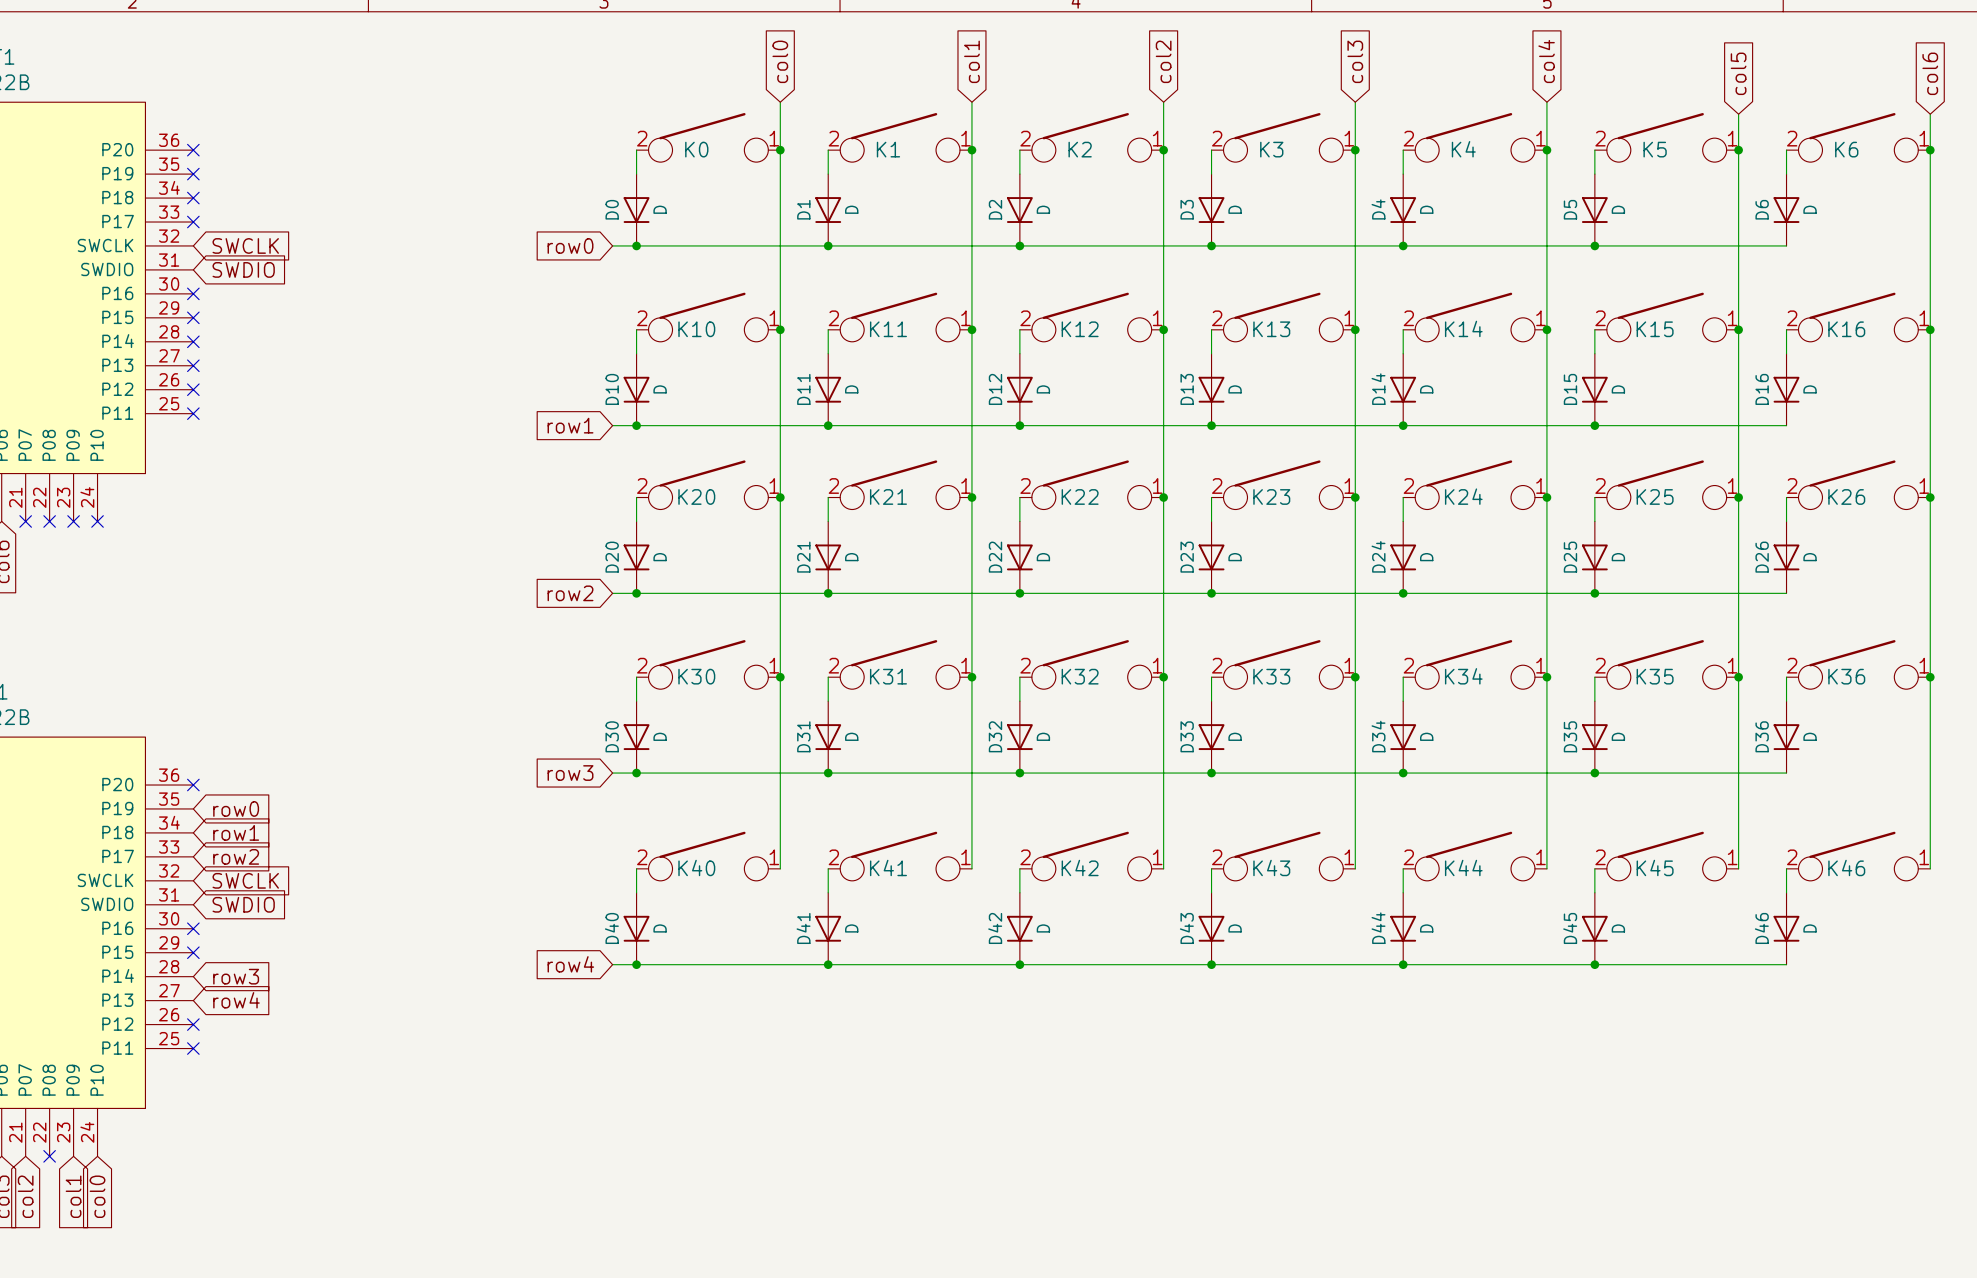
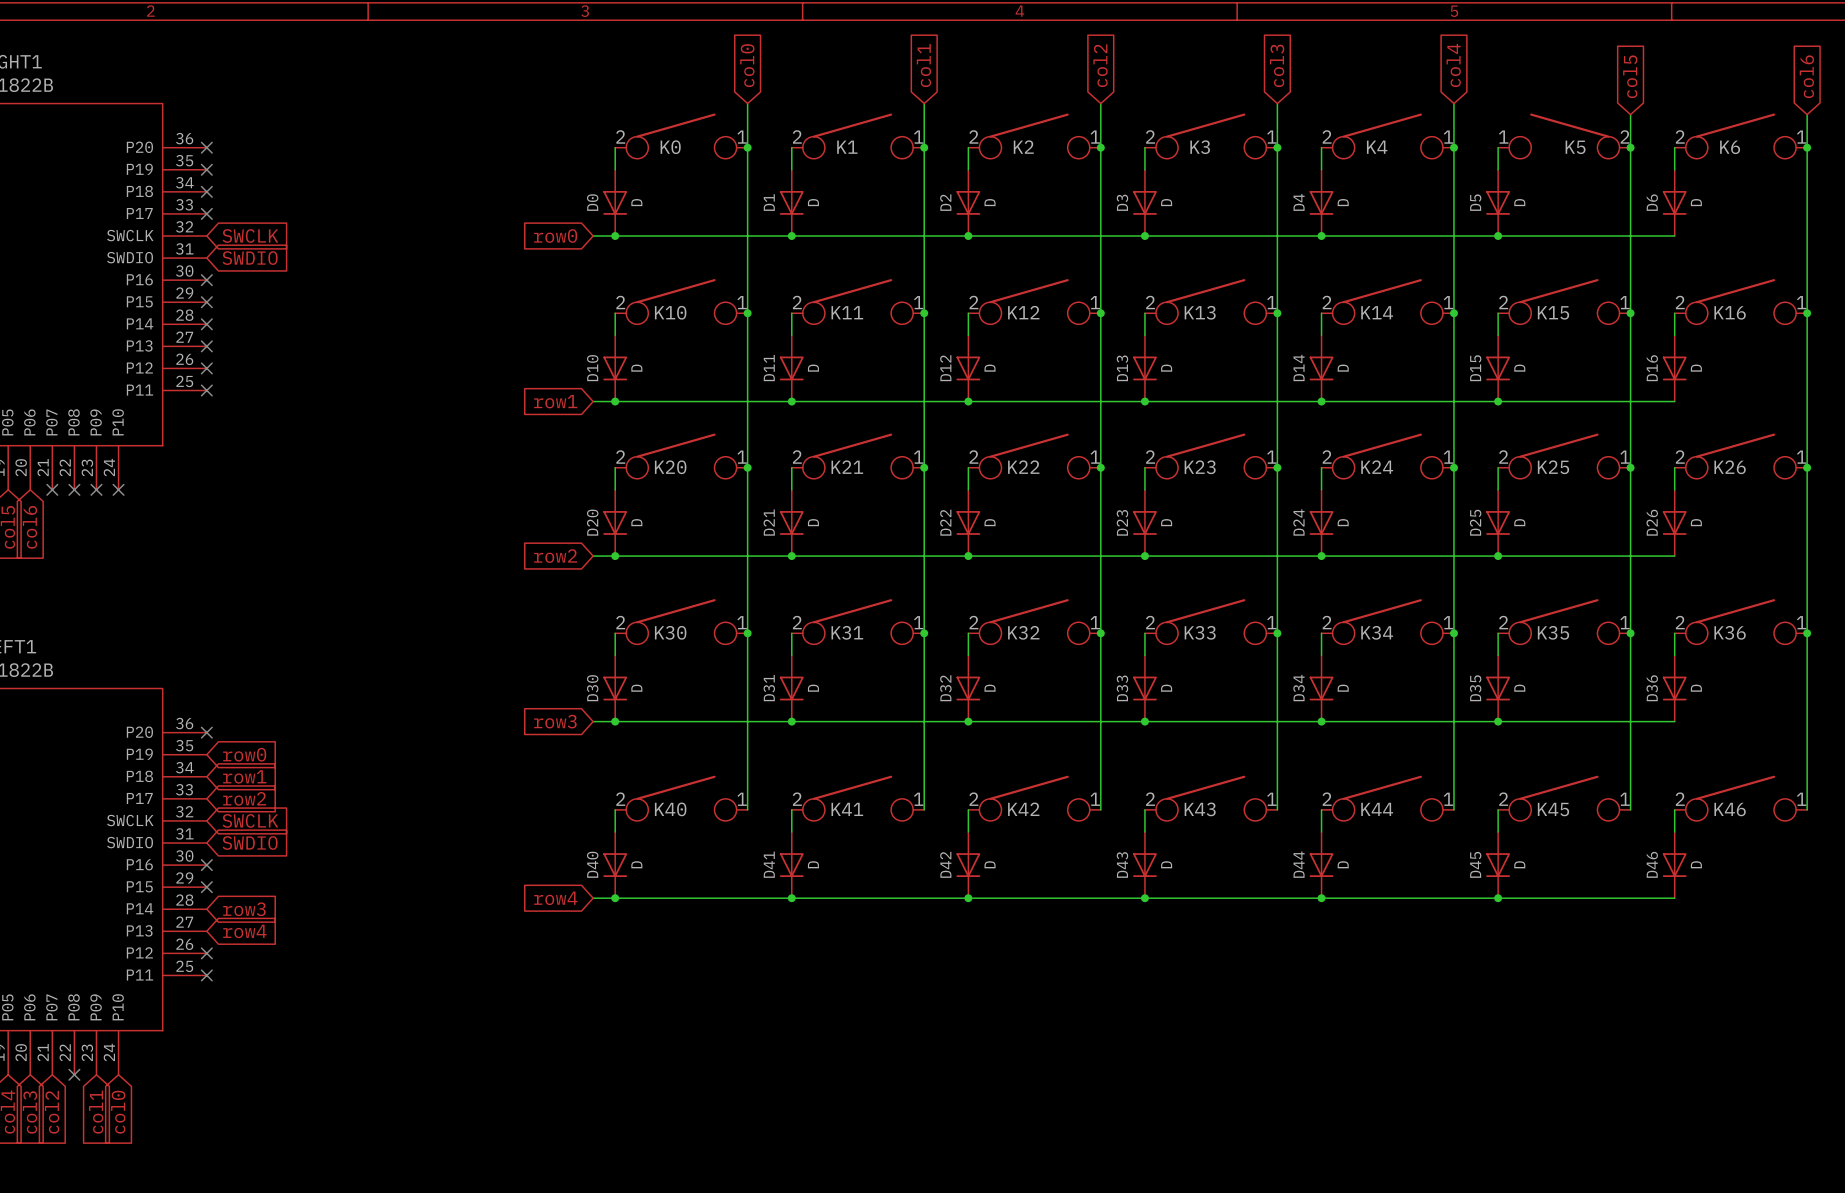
K5 flip: as is (1666, 137) -> left-right (1564, 136)

